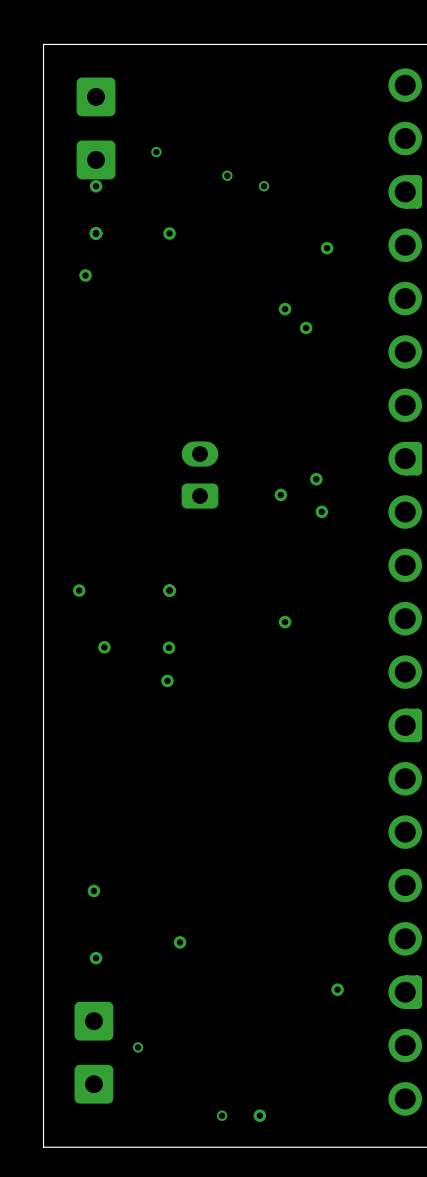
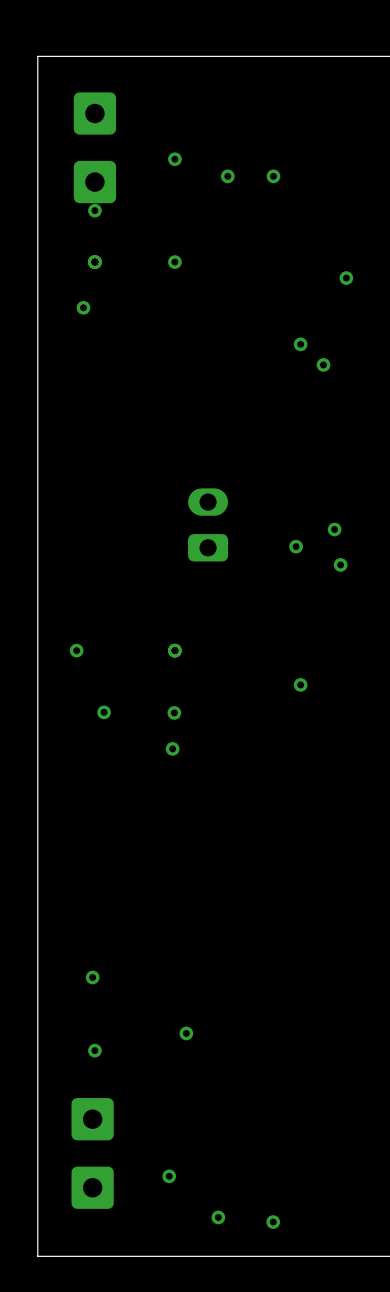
via: none -> (174, 159)
via: (156, 152) -> none
via: none -> (227, 176)
via: none -> (273, 176)
via: (227, 175) -> none
via: (264, 186) -> none
via: (337, 989) -> none
via: (138, 1047) -> none
via: none -> (169, 1176)
via: none -> (218, 1217)
via: (222, 1115) -> none

